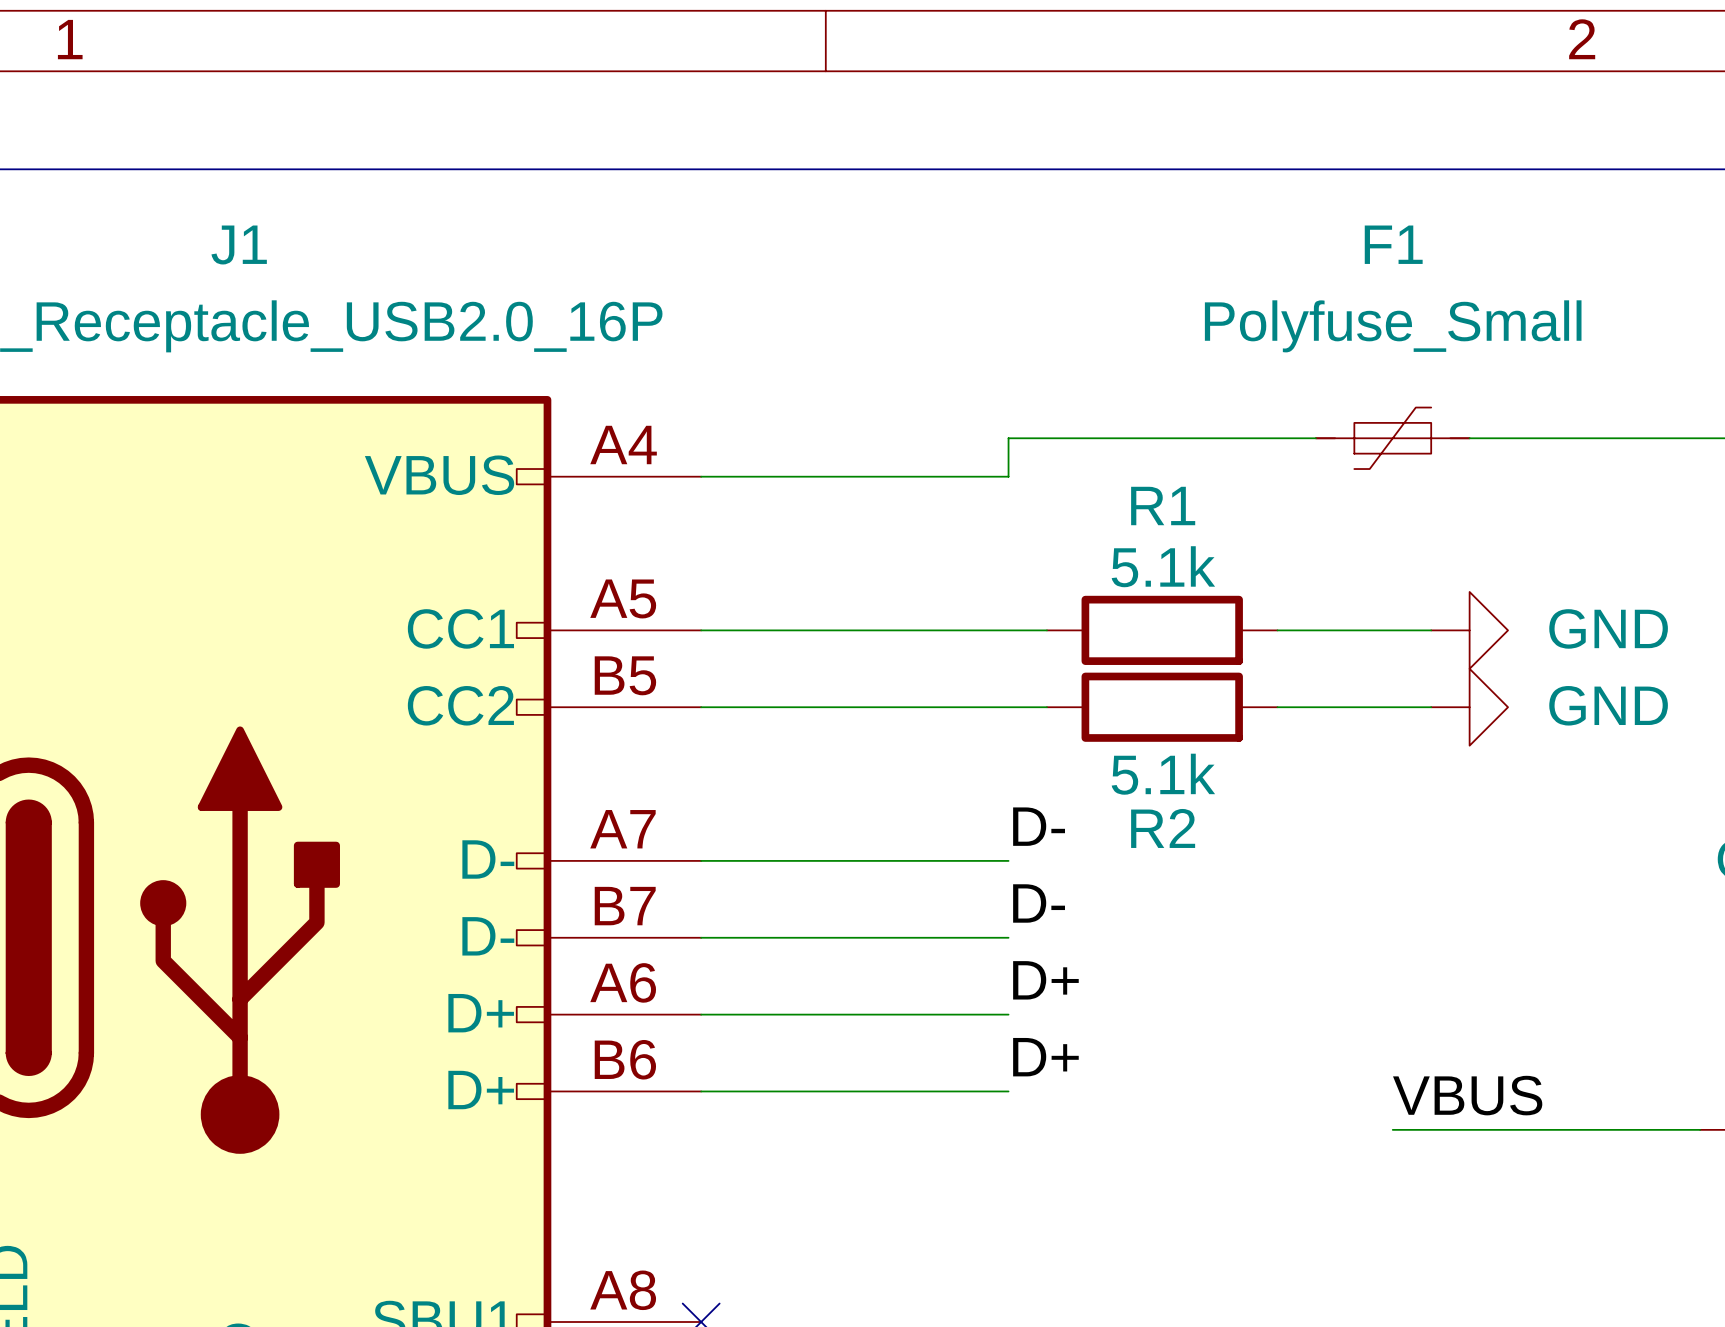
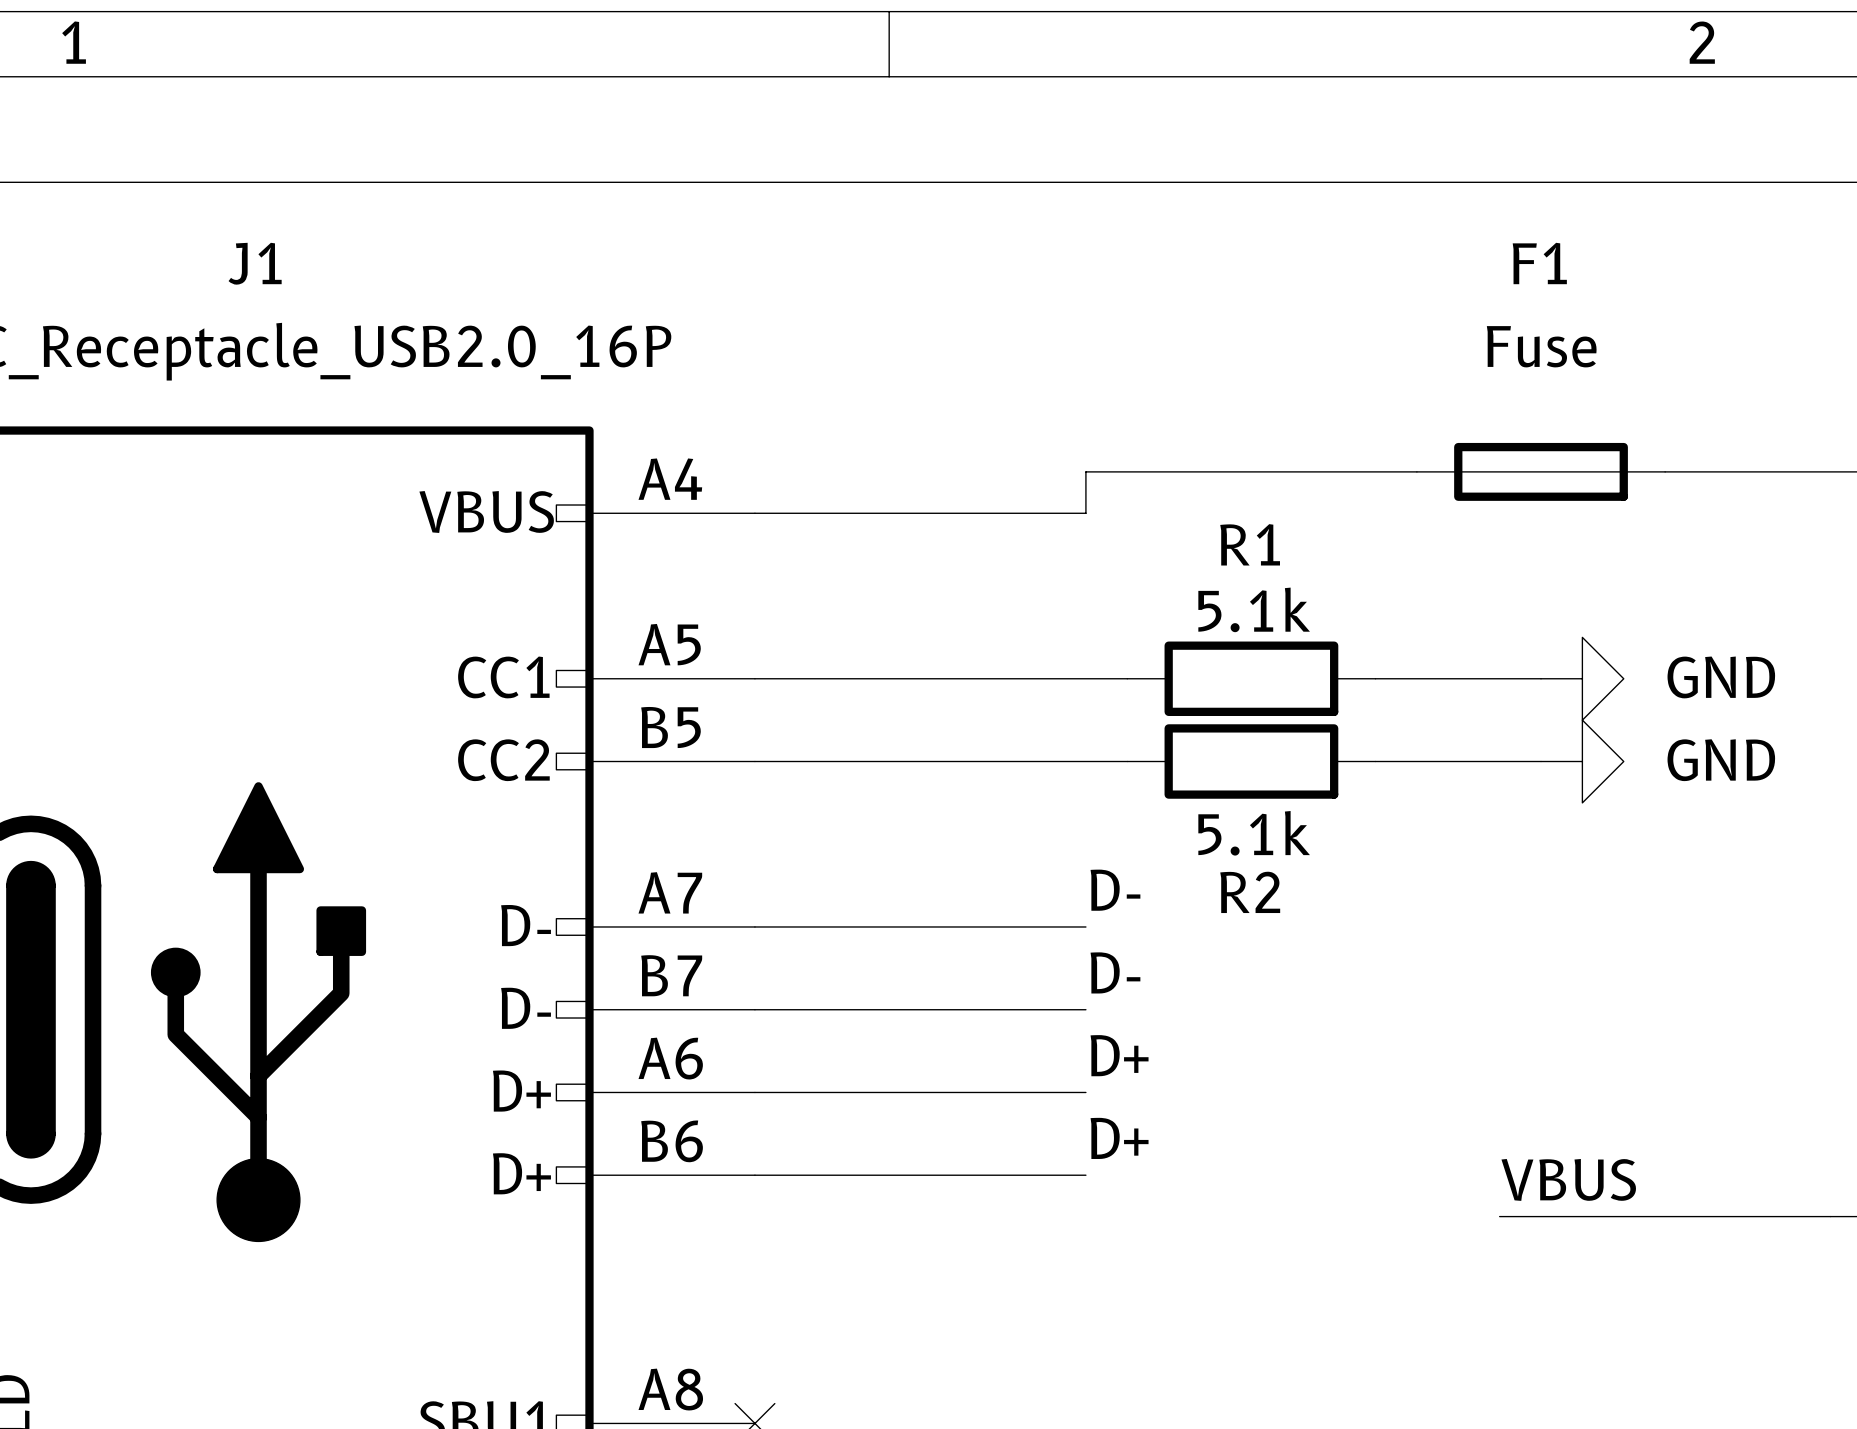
F1 value: Polyfuse_Small (1393, 326) -> Fuse (1541, 346)
F1 symbol: [1315, 407, 1470, 470] -> [1416, 442, 1666, 501]

